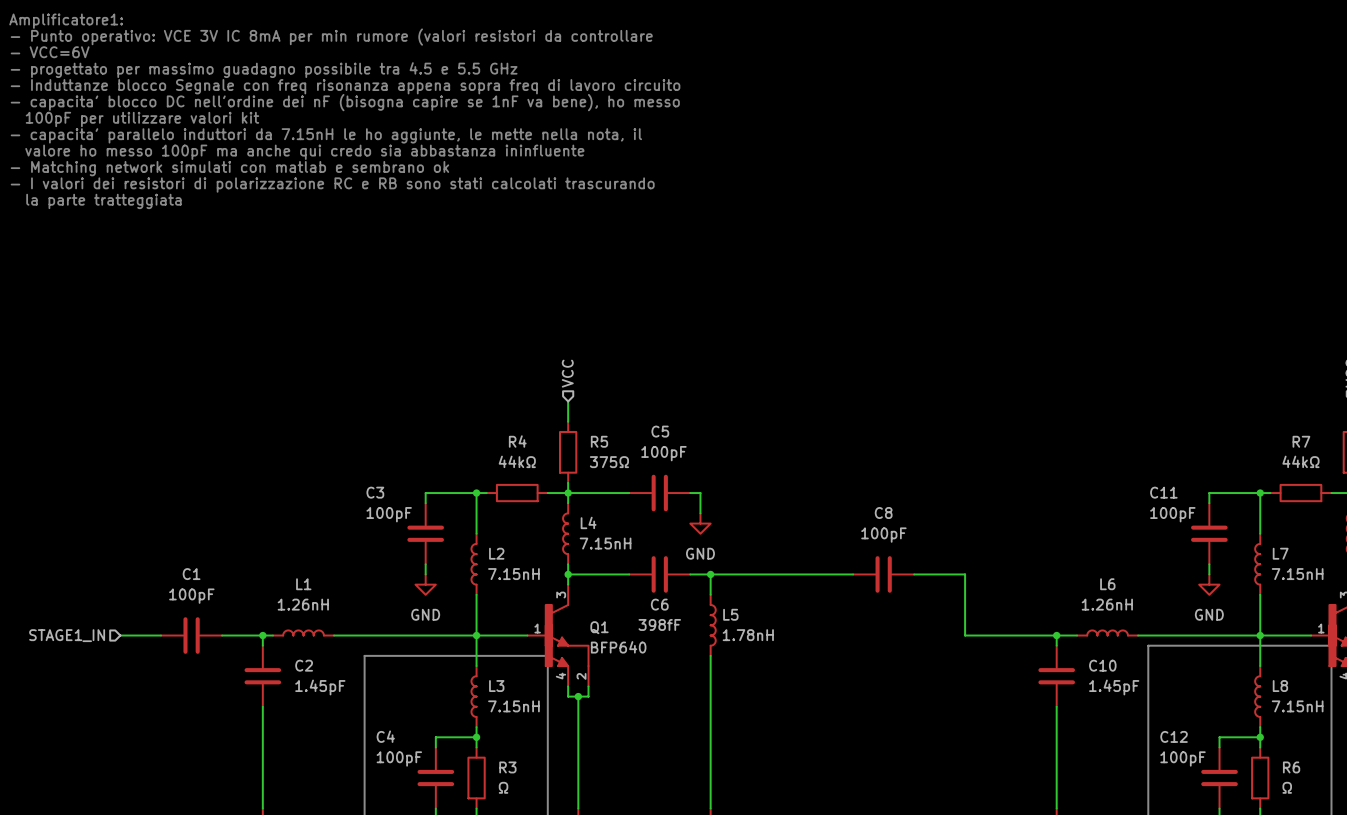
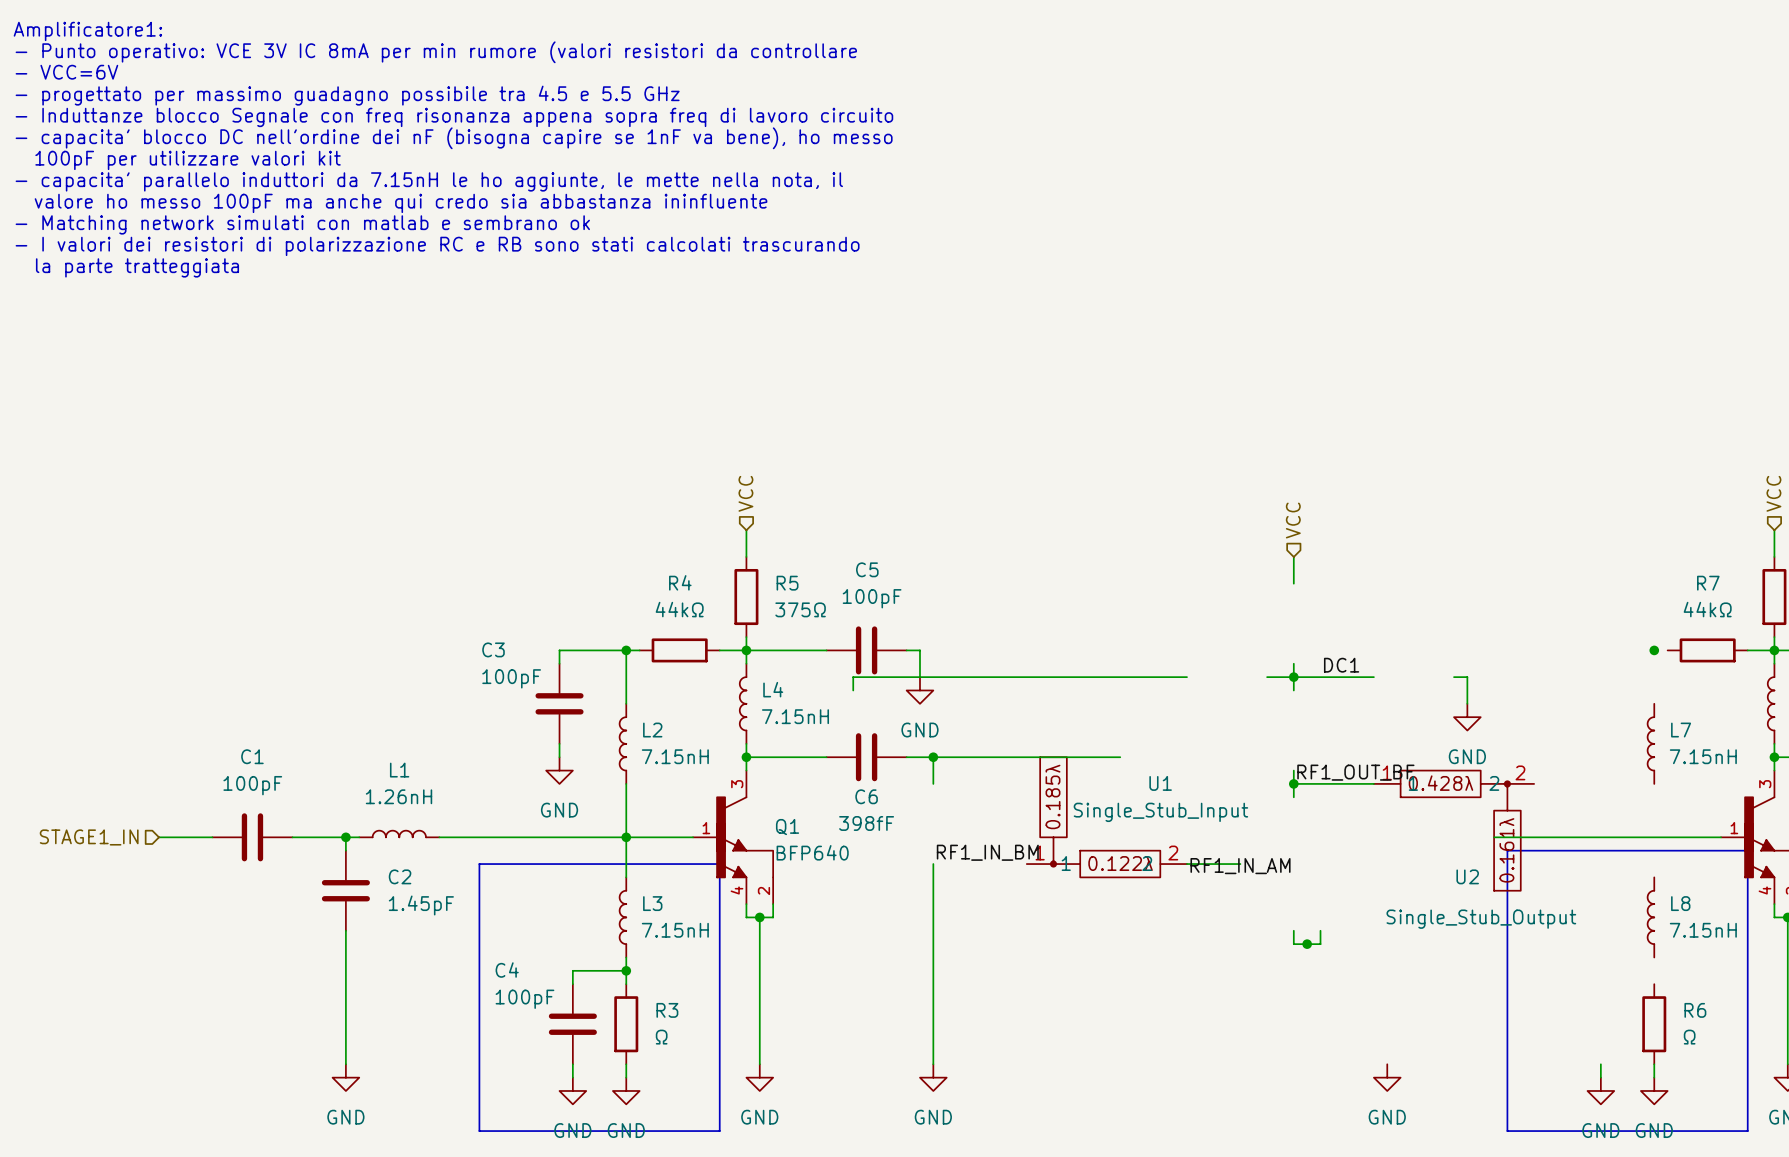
hierarchical label: none -> VCC (1293, 520)
wire: none -> (1293, 556) (1293, 583)
wire: (1260, 493) (1260, 533) -> none
wire: (1270, 493) (1209, 493) (1209, 503) -> none
wire: none -> (1293, 663) (1293, 690)
label: none -> DC1 (1341, 665)
wire: none -> (1187, 677) (853, 677) (853, 690)
wire: none -> (1267, 677) (1373, 677)
junction: none -> (1293, 677)
wire: none -> (1454, 677) (1467, 677) (1467, 703)
C11: 100pF (1209, 533) -> none
wire: (1209, 564) (1209, 574) -> none
C8: 100pF (883, 574) -> none
wire: (914, 574) (965, 574) (965, 635) (1077, 635) -> none
wire: none -> (1293, 770) (1293, 797)
power symbol position: GND (1209, 584) -> GND (1467, 717)
label: none -> RF1_OUT_BF (1355, 772)
wire: none -> (1293, 783) (1373, 783)
junction: none -> (1293, 783)
wire: (1260, 594) (1260, 666) -> none
U1: none -> Single_Stub_Input (1106, 817)
L5: 1.78nH (713, 625) -> none
U2: none -> Single_Stub_Output (1454, 830)
L6: 1.26nH (1107, 632) -> none
wire: (1056, 635) (1056, 645) -> none
junction: (1056, 635) -> none
junction: (1260, 635) -> none
label: none -> RF1_IN_BM (987, 852)
wire: none -> (1187, 864) (1240, 864)
label: none -> RF1_IN_AM (1240, 866)
C10: 1.45pF (1056, 676) -> none
wire: none -> (1293, 930) (1293, 944) (1320, 944) (1320, 930)
wire: (1056, 706) (1056, 808) -> none
junction: none -> (1307, 944)
wire: (1260, 727) (1260, 747) -> none
wire: (1260, 737) (1219, 737) (1219, 747) -> none
junction: (1260, 737) -> none
C12: 100pF (1219, 778) -> none

